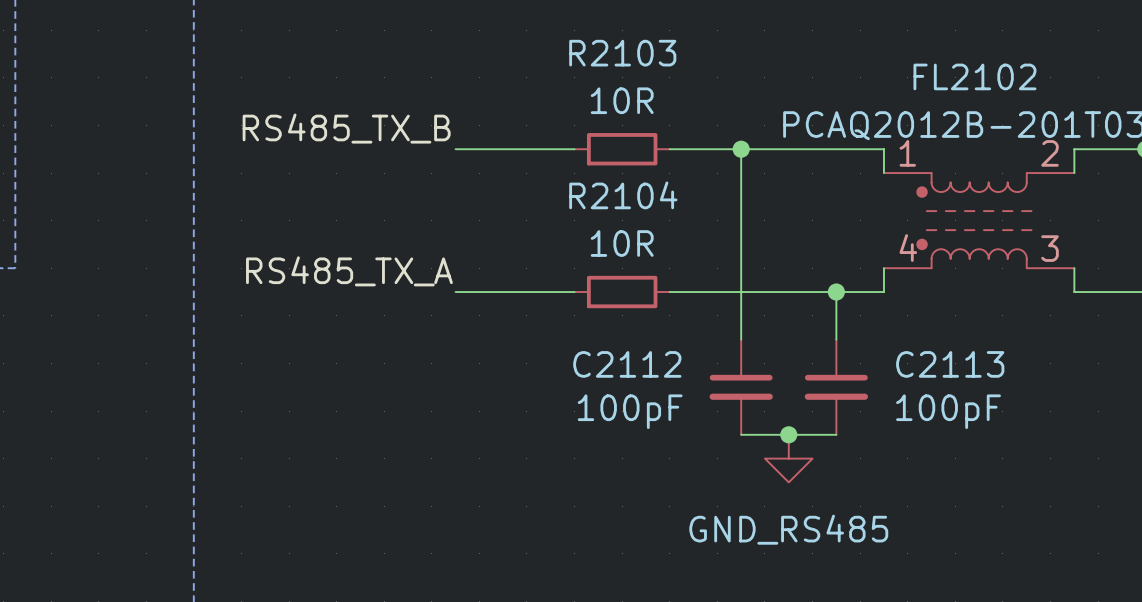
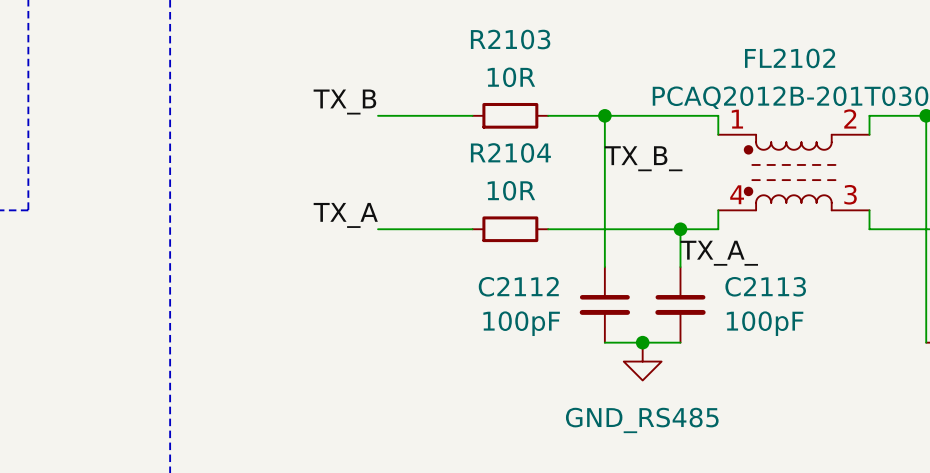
label: RS485_TX_B (346, 128) -> TX_B (344, 102)
label: none -> TX_B_ (643, 158)
label: RS485_TX_A (349, 271) -> TX_A (345, 215)
label: none -> TX_A_ (719, 253)

